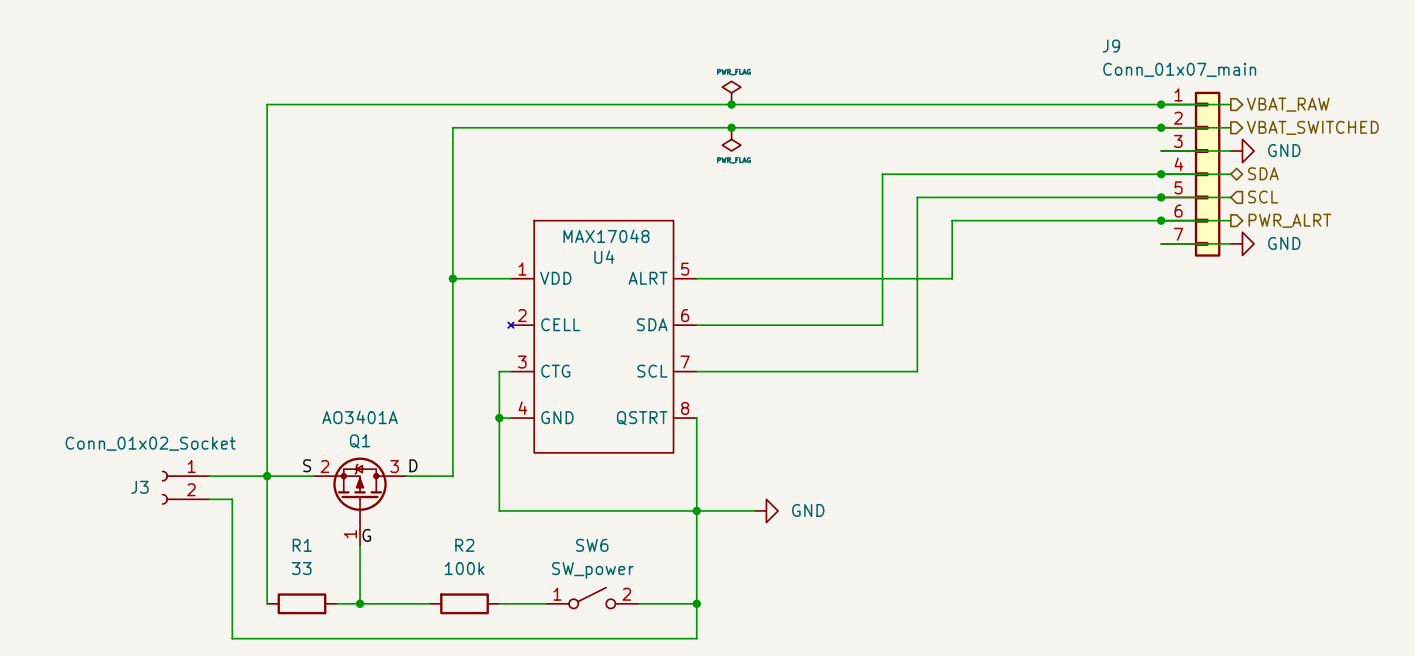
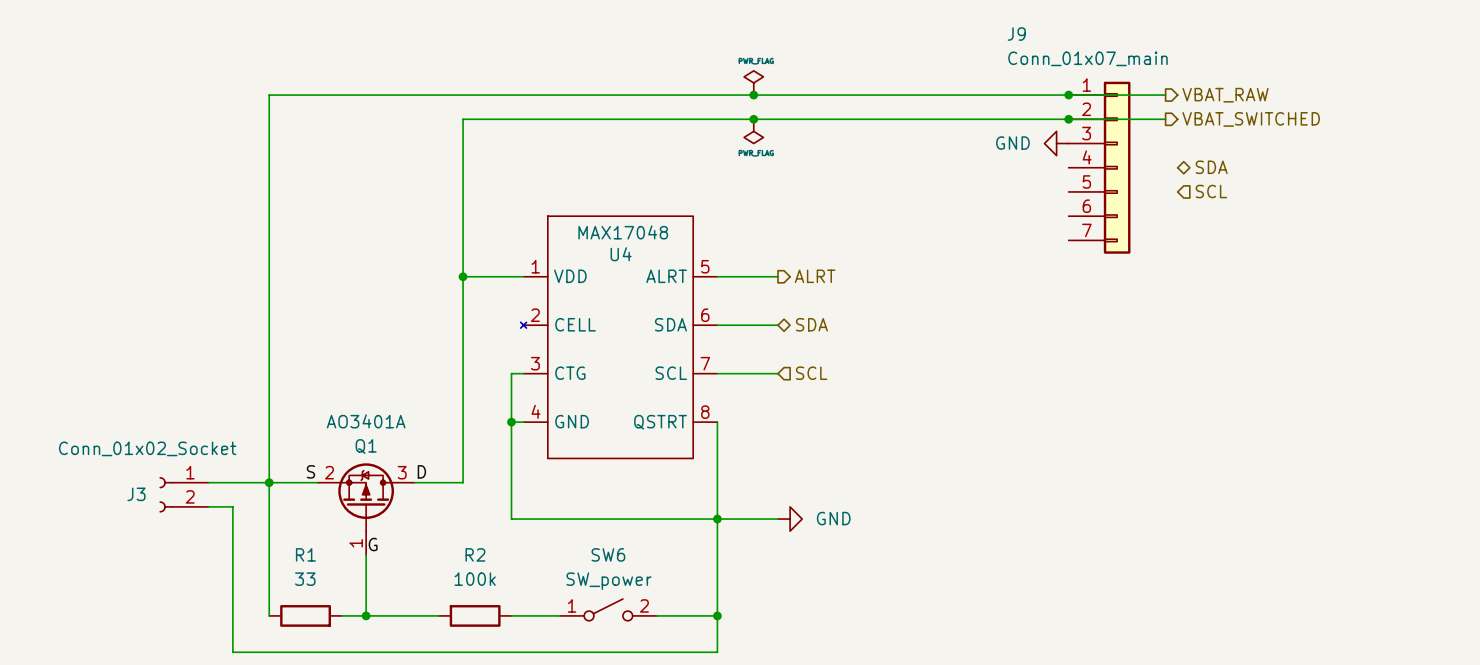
junction: none -> (1068, 95)
wire: (1126, 104) (1230, 104) -> none
junction: (1161, 104) -> none
hierarchical label position: VBAT_RAW (1288, 104) -> VBAT_RAW (1225, 95)
junction: none -> (1068, 119)
wire: (1126, 127) (1230, 127) -> none
junction: (1161, 127) -> none
hierarchical label position: VBAT_SWITCHED (1312, 127) -> VBAT_SWITCHED (1251, 119)
power symbol: none -> GND (1056, 143)
wire: (1161, 151) (1230, 151) -> none
power symbol: GND (1242, 151) -> none
hierarchical label position: SDA (1263, 173) -> SDA (1211, 167)
junction: (1161, 174) -> none
J9 position: (1190, 174) -> (1099, 167)
wire: (1230, 174) (882, 174) (882, 325) (754, 325) -> none
junction: (1161, 197) -> none
wire: (1230, 197) (917, 197) (917, 371) (754, 371) -> none
hierarchical label position: SCL (1263, 197) -> SCL (1211, 191)
junction: (1161, 220) -> none
wire: (1230, 220) (952, 220) (952, 278) (754, 278) -> none
hierarchical label: PWR_ALRT (1289, 220) -> none
wire: (1161, 243) (1230, 243) -> none
power symbol: GND (1242, 243) -> none
hierarchical label: none -> ALRT (815, 276)
hierarchical label: none -> SDA (811, 324)
hierarchical label: none -> SCL (811, 373)

